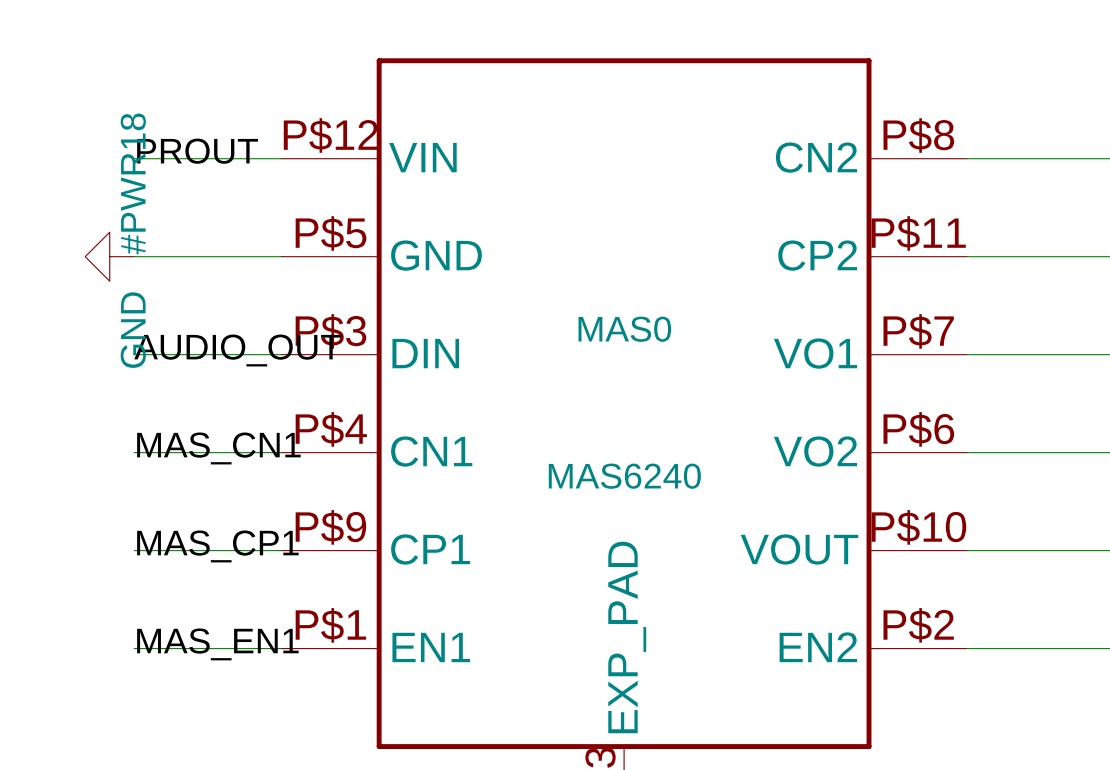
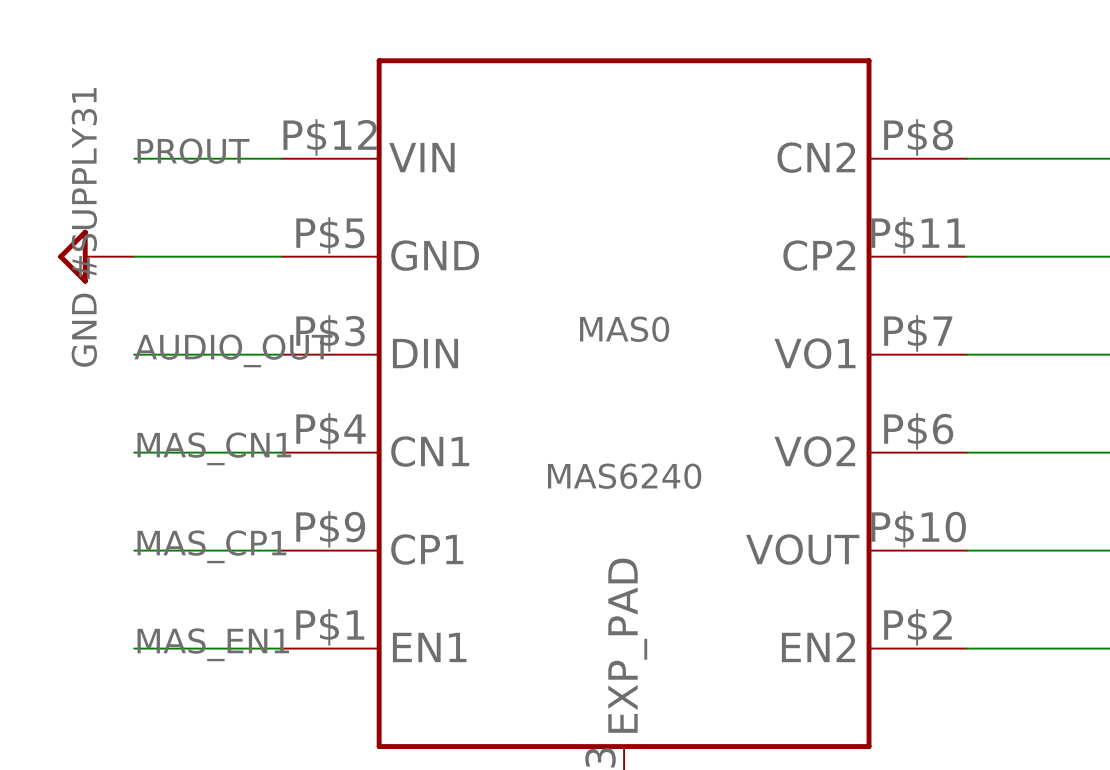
#PWR18 name: #PWR18 (133, 183) -> #SUPPLY31 (84, 183)
#PWR18 shape: [85, 232, 135, 282] -> [58, 229, 135, 284]

